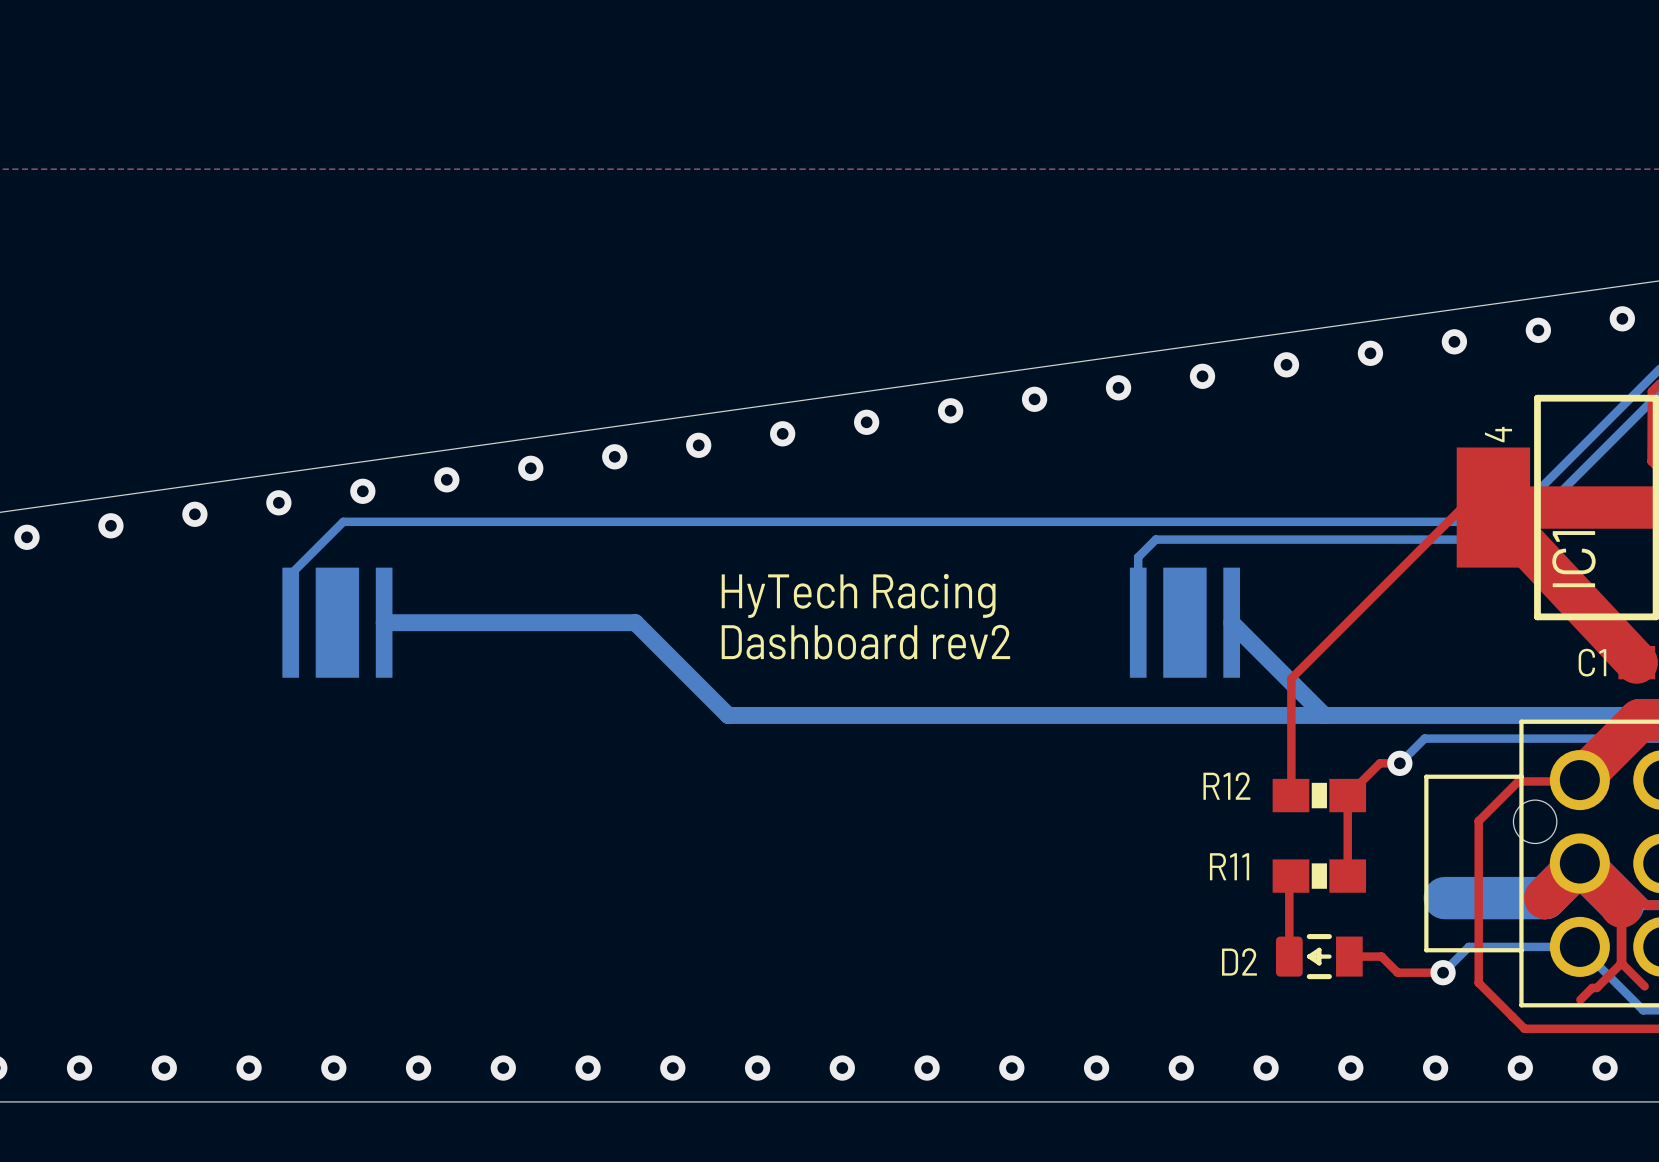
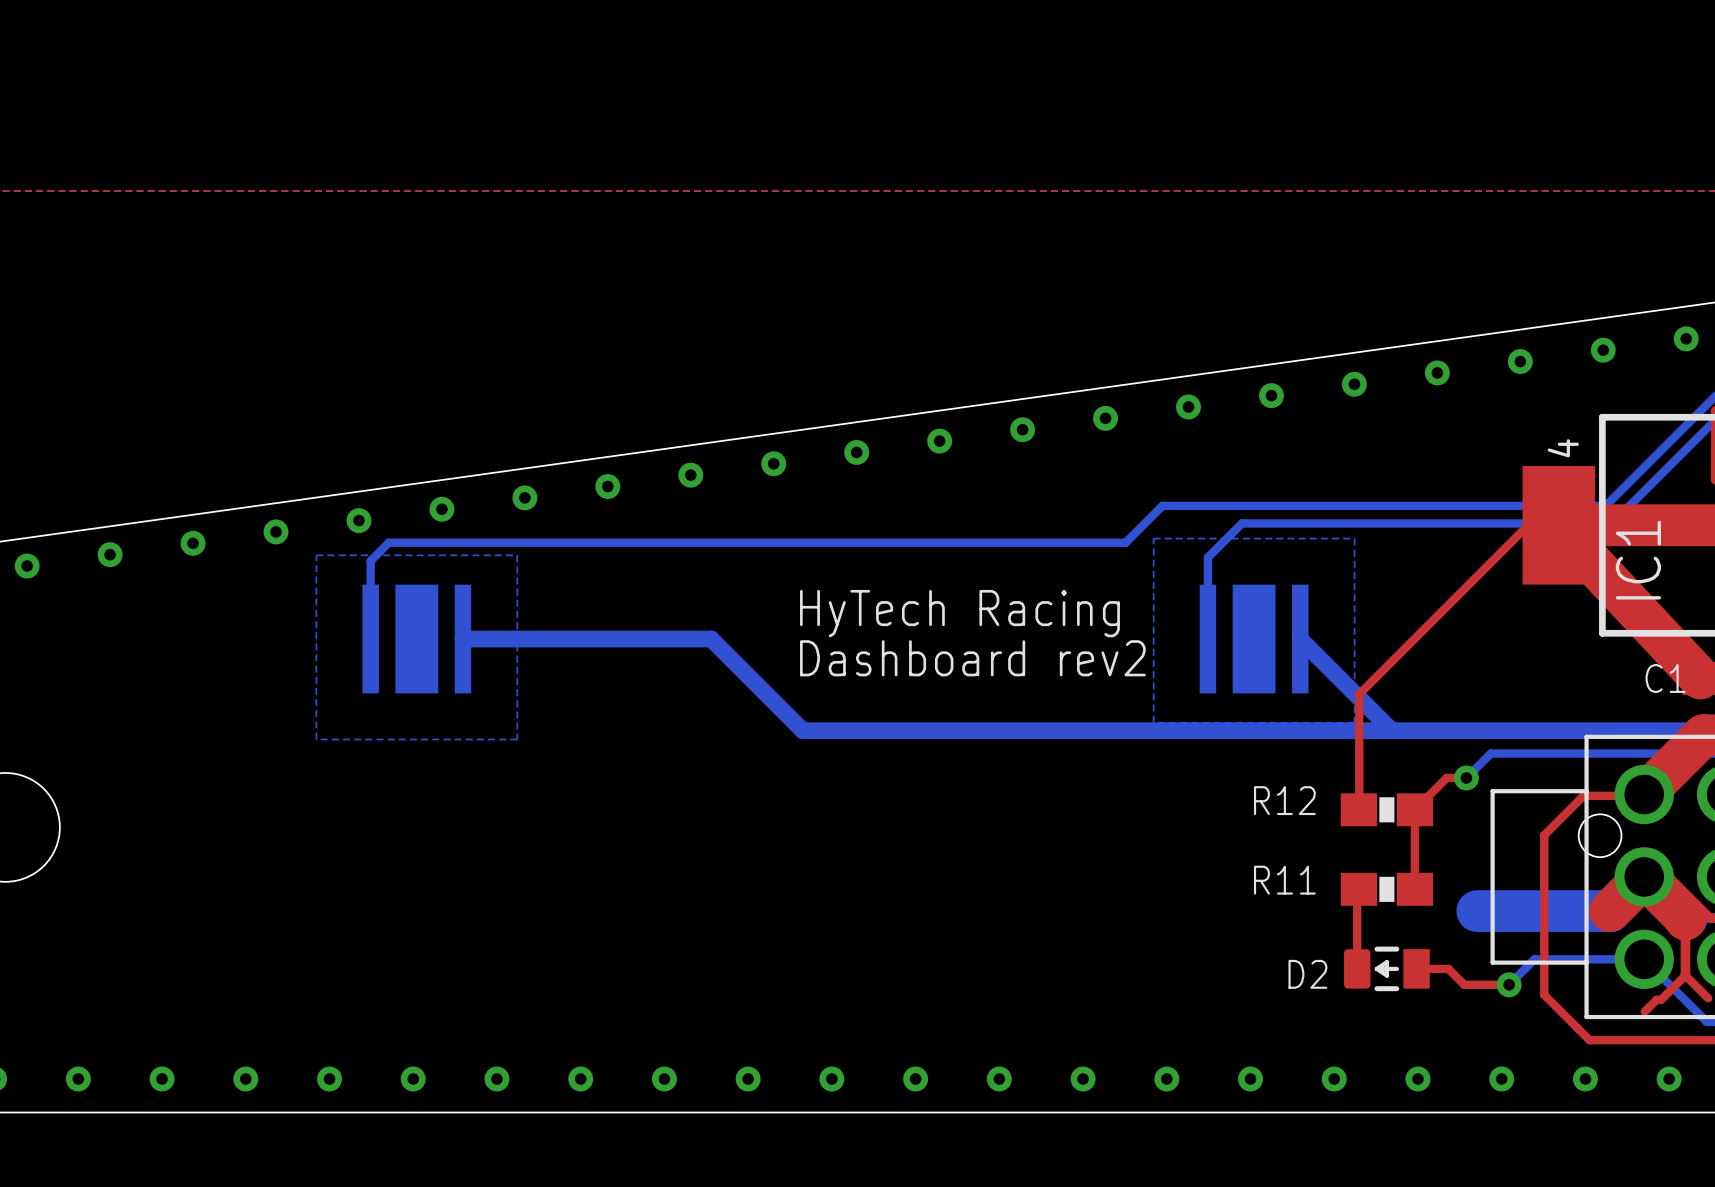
bottom track: (1540, 487) (1506, 521) (343, 521) (290, 574) -> (1605, 505) (1162, 505) (1125, 542) (388, 542) (370, 560) (370, 591)
bottom track: (1547, 505) (1513, 539) (1155, 539) (1138, 557) -> (1611, 523) (1242, 523) (1207, 557) (1207, 574)
bottom zone outline: none -> (1153, 538) (1354, 538) (1354, 722) (1153, 722) (1153, 538)
bottom zone outline: none -> (316, 555) (517, 555) (517, 739) (316, 739) (316, 555)
bottom track: none -> (1477, 911) (1510, 911)

